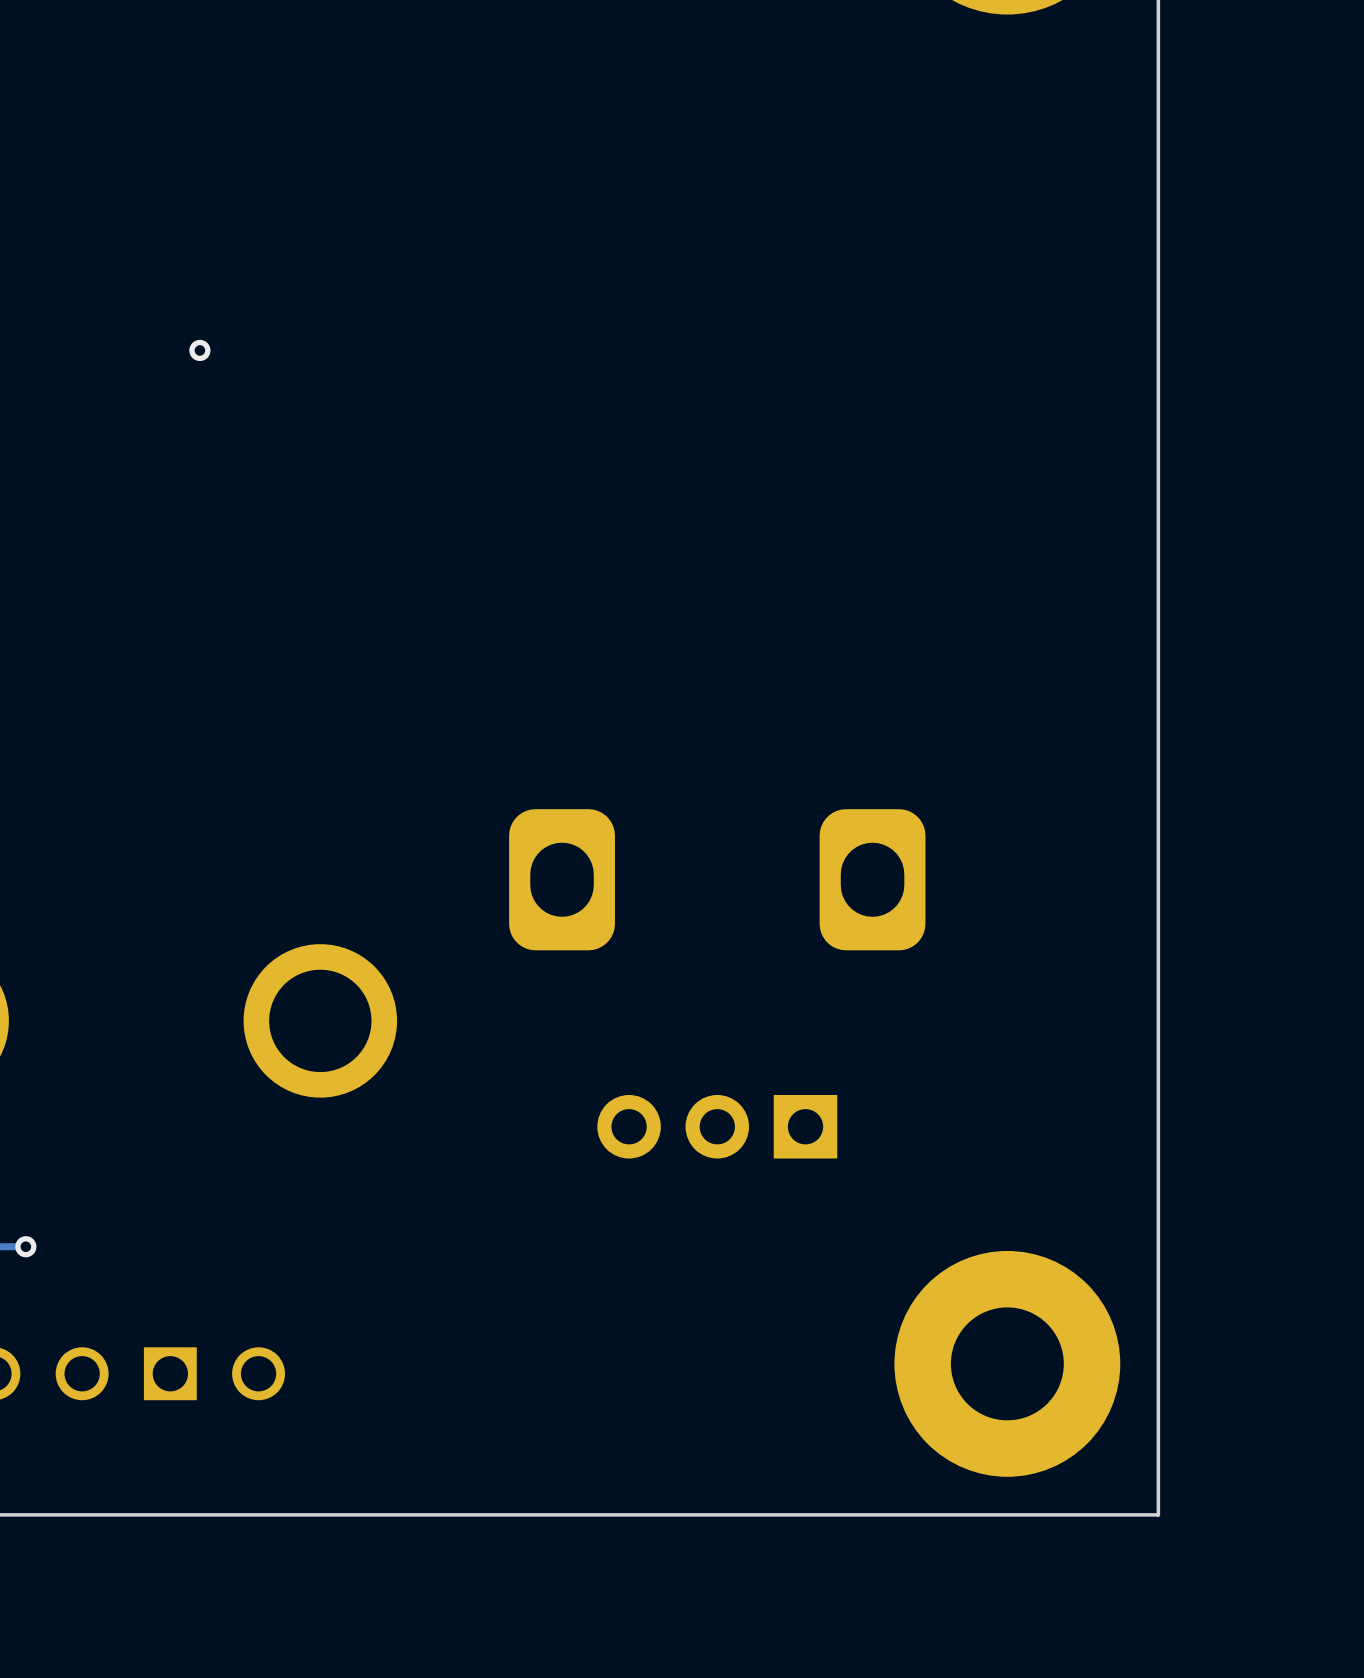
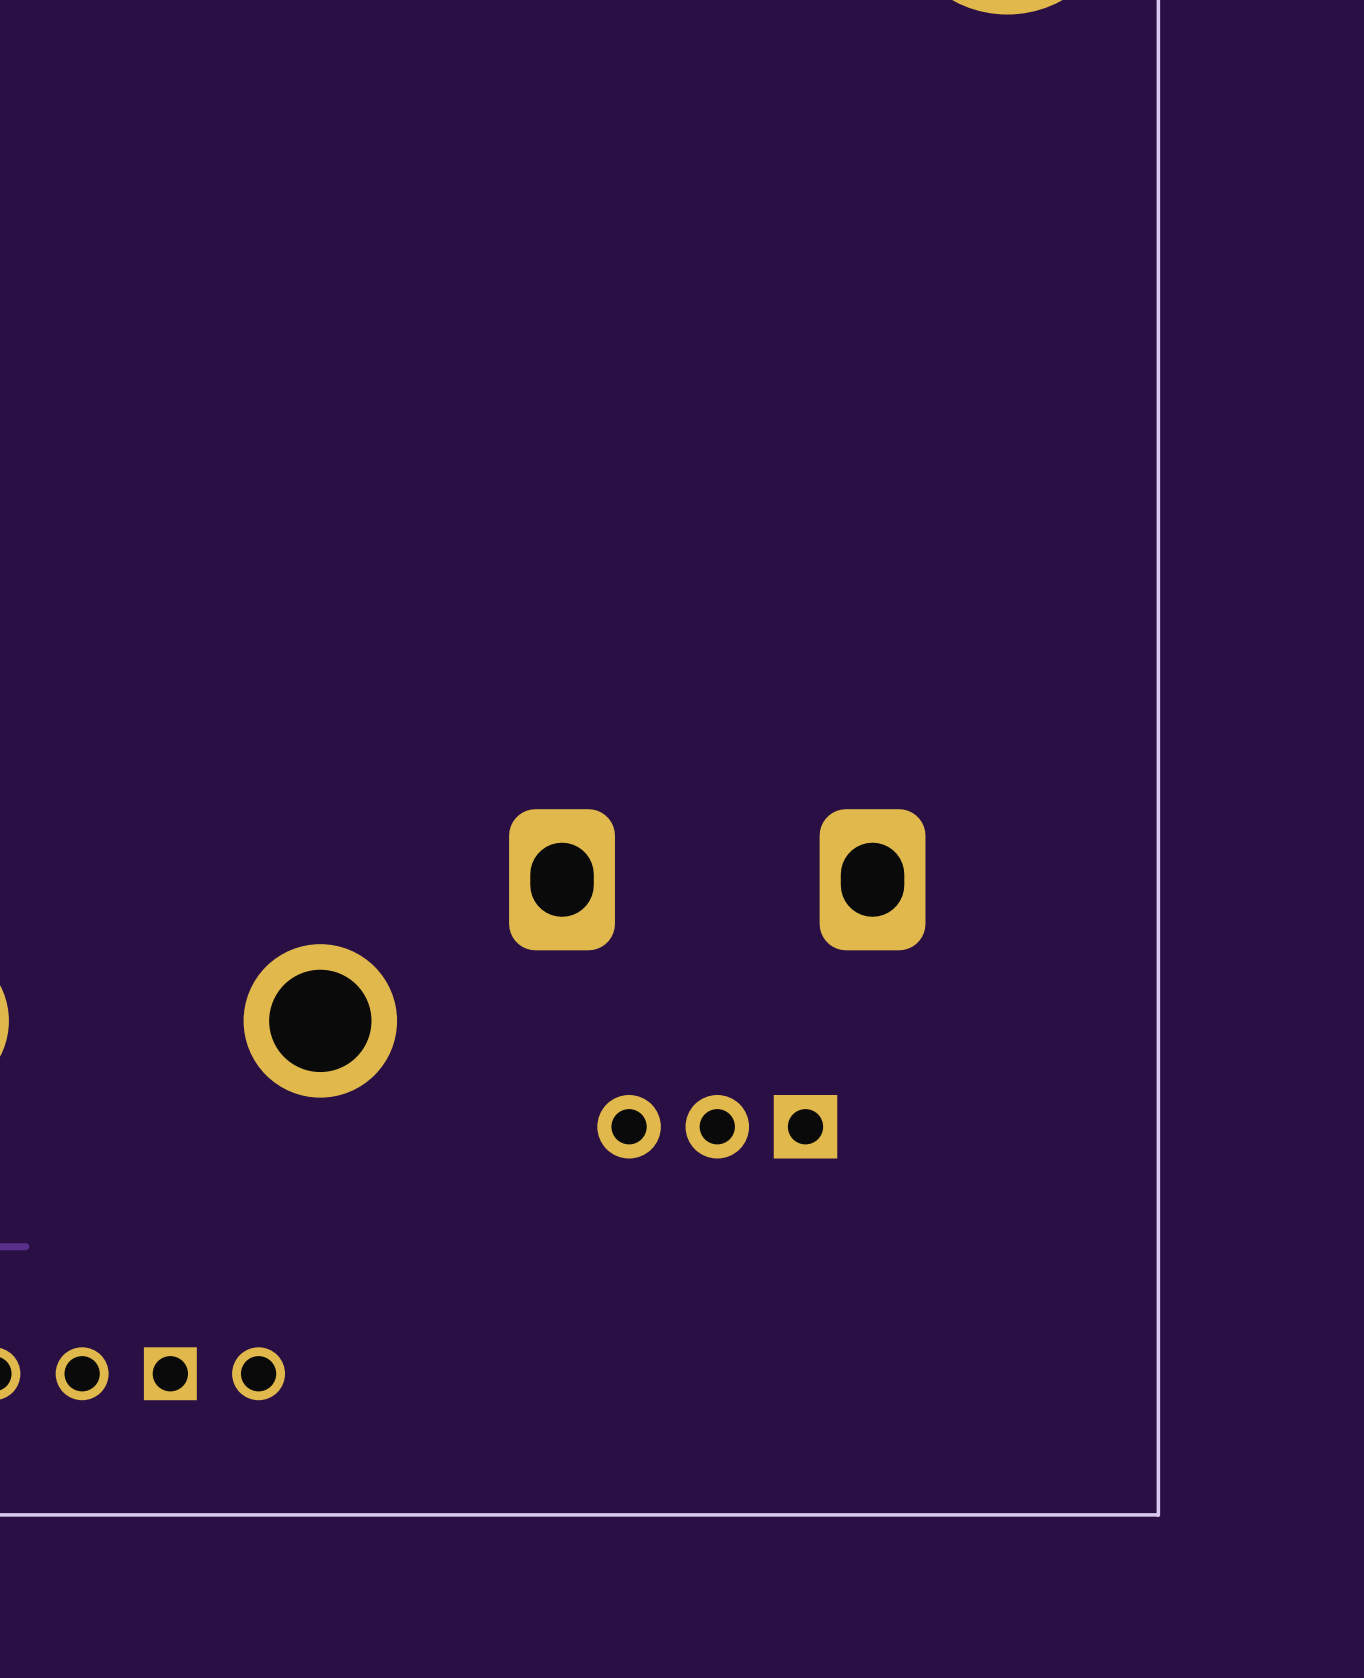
via: (199, 350) -> none
via: (25, 1246) -> none
part: (1007, 1363) -> none

